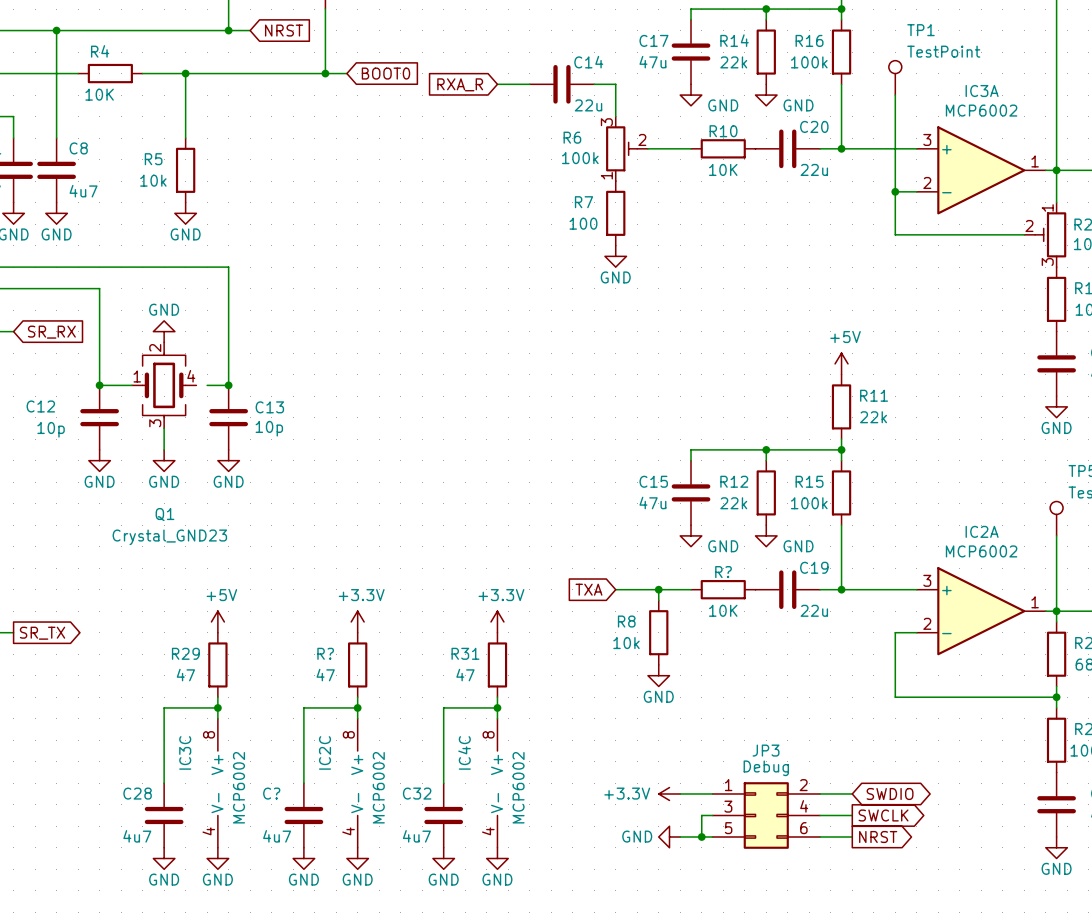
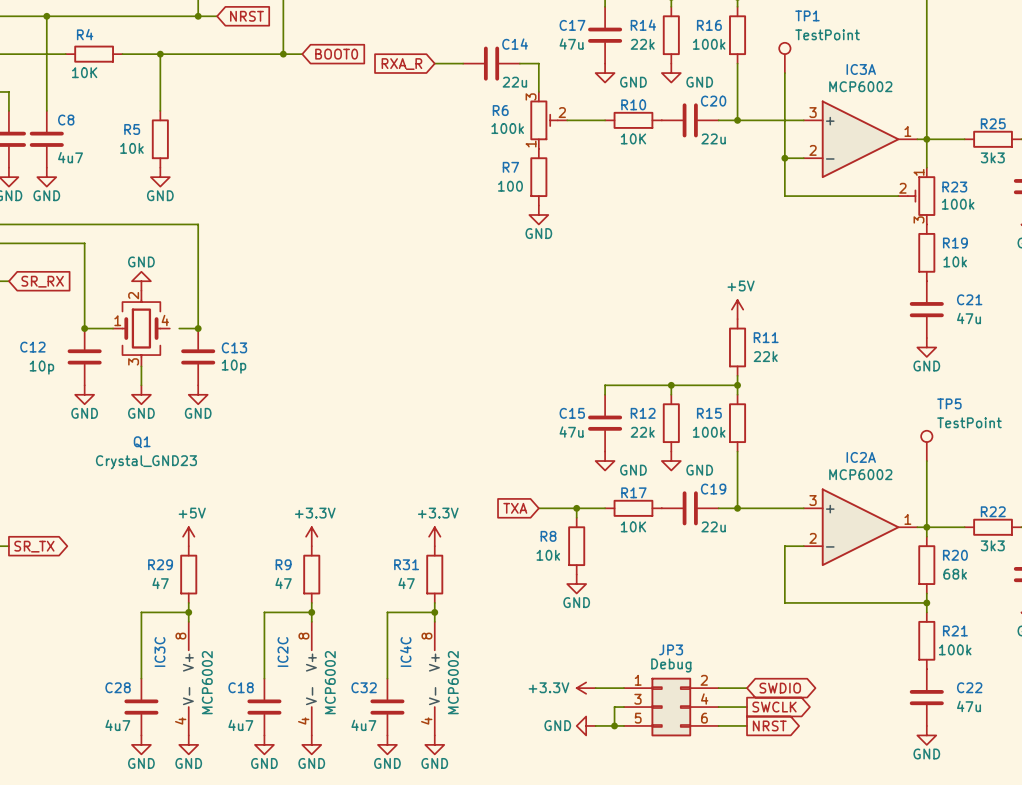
R? name: R? (723, 572) -> R17 (633, 492)
R? name: R? (325, 653) -> R9 (283, 564)
C? name: C? (271, 793) -> C18 (241, 687)

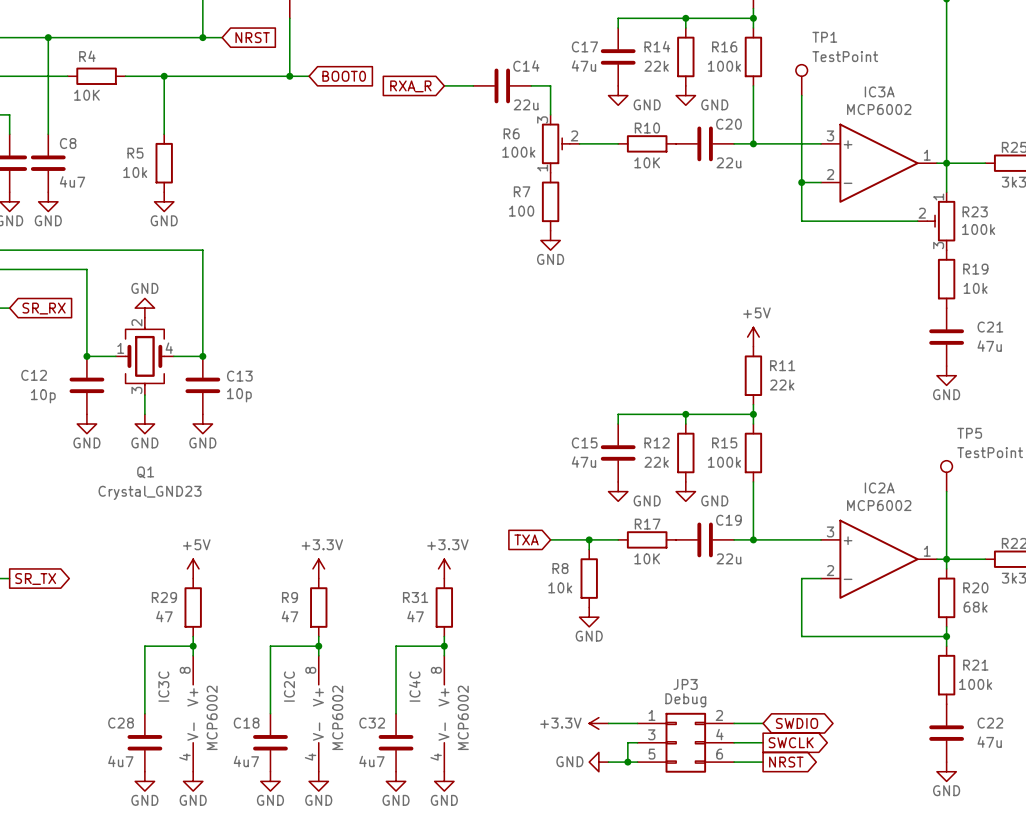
wire: none -> (173, 356) (183, 356)

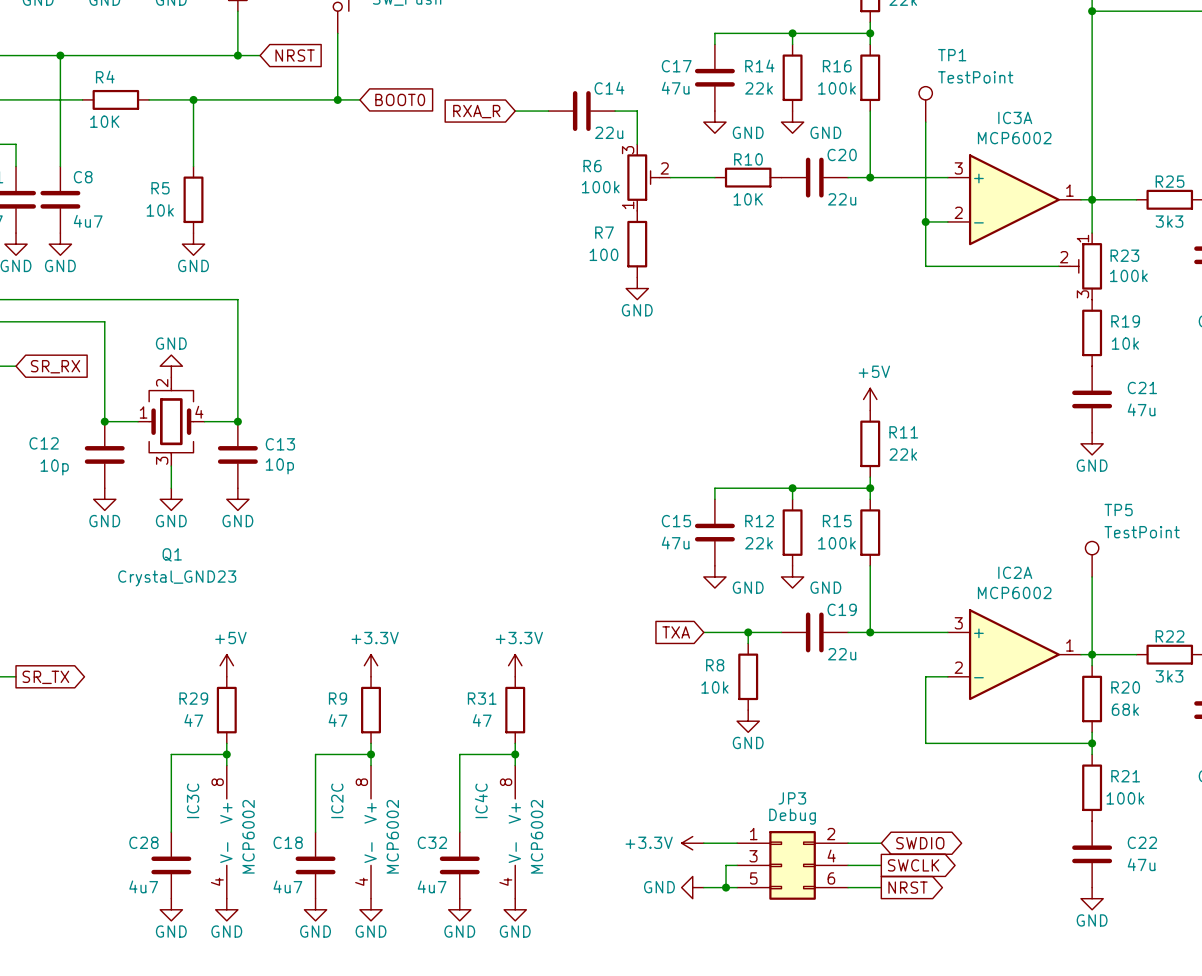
global label position: TXA (526, 539) -> TXA (676, 632)
wire: (550, 539) (608, 539) -> (714, 632) (781, 632)
wire: (589, 539) (589, 549) -> (748, 632) (748, 643)
junction: (589, 539) -> none
R17: 10K (647, 539) -> none
junction: none -> (748, 632)
R8 position: (589, 578) -> (748, 676)
power symbol position: GND (589, 617) -> GND (748, 721)

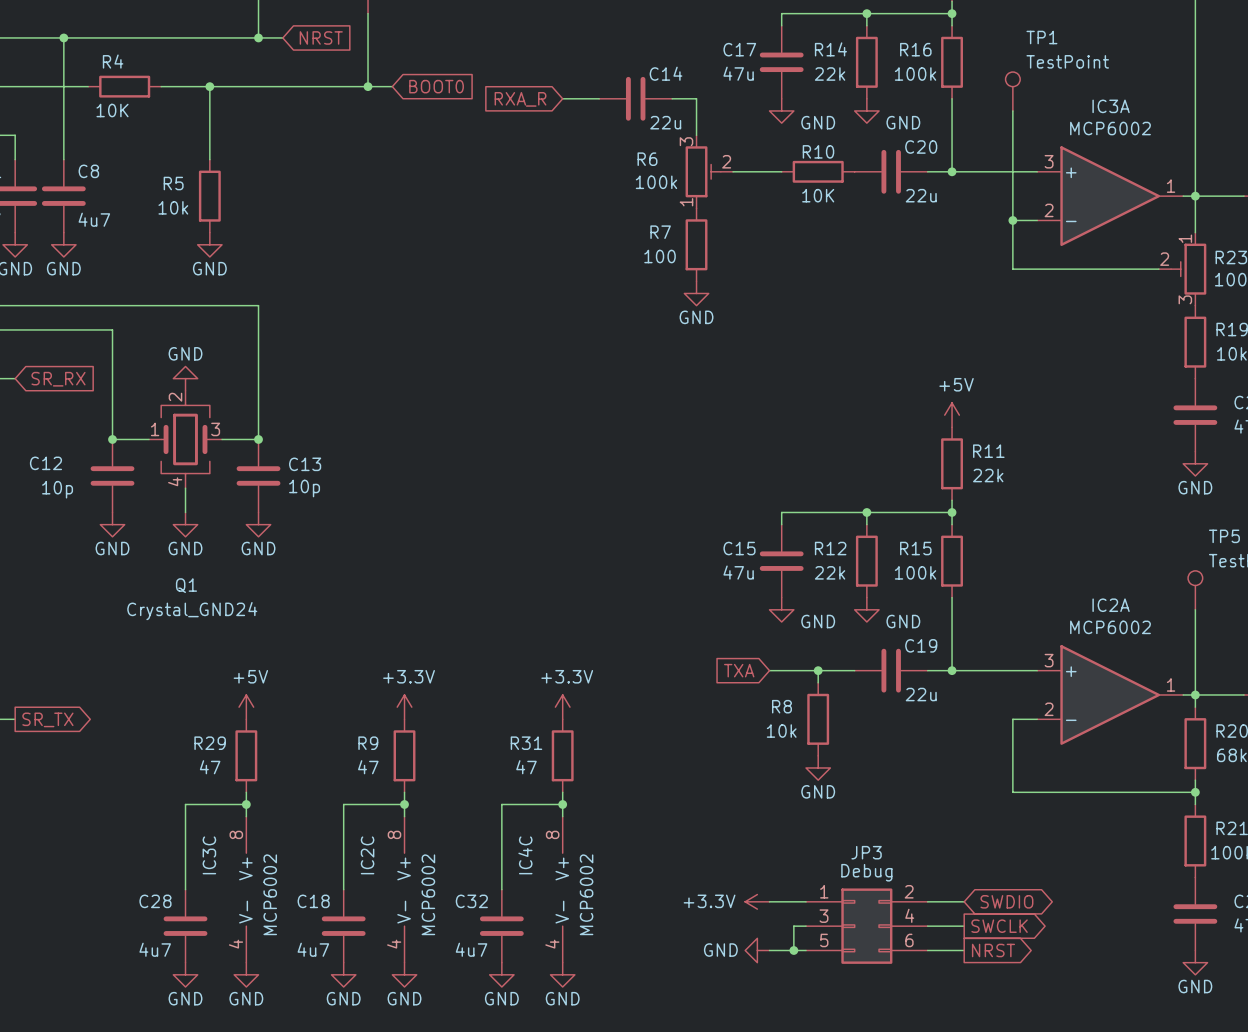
Q1 pin number: 4 (199, 412) -> 3 (215, 429)
Q1 pin number: 3 (162, 460) -> 4 (175, 481)
Q1 value: Crystal_GND23 (177, 578) -> Crystal_GND24 (192, 611)

